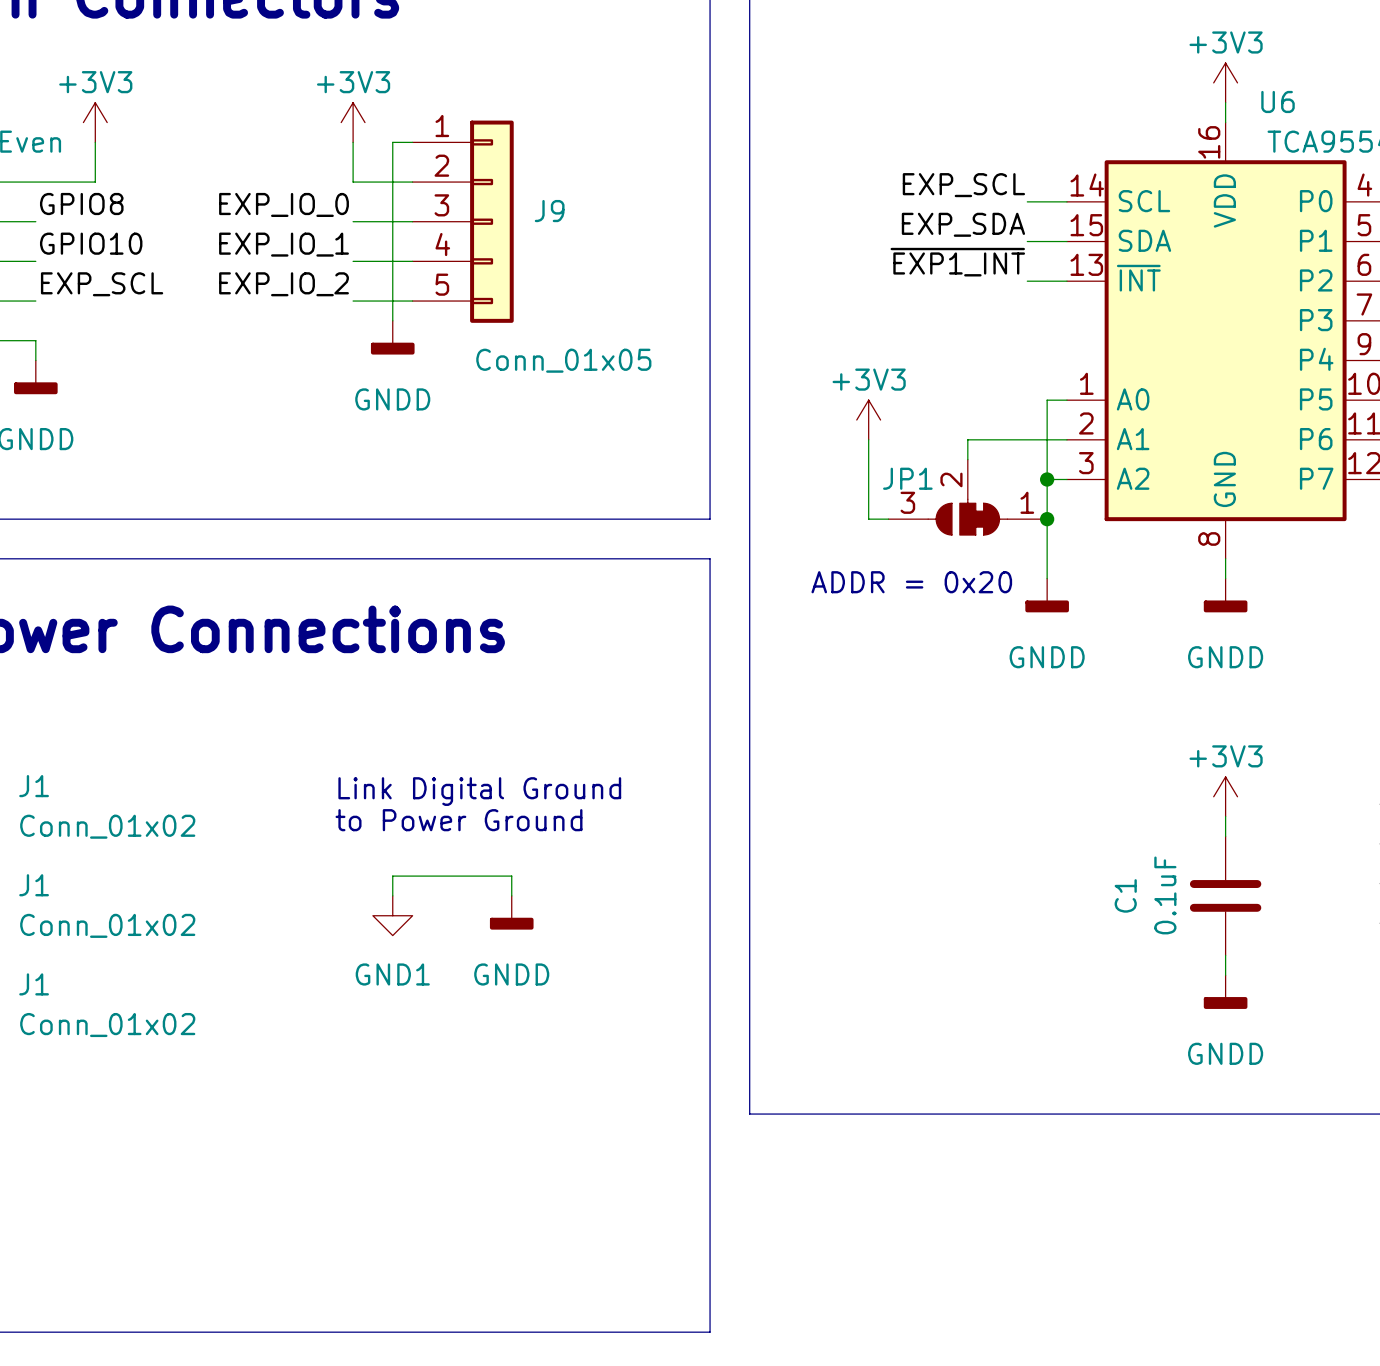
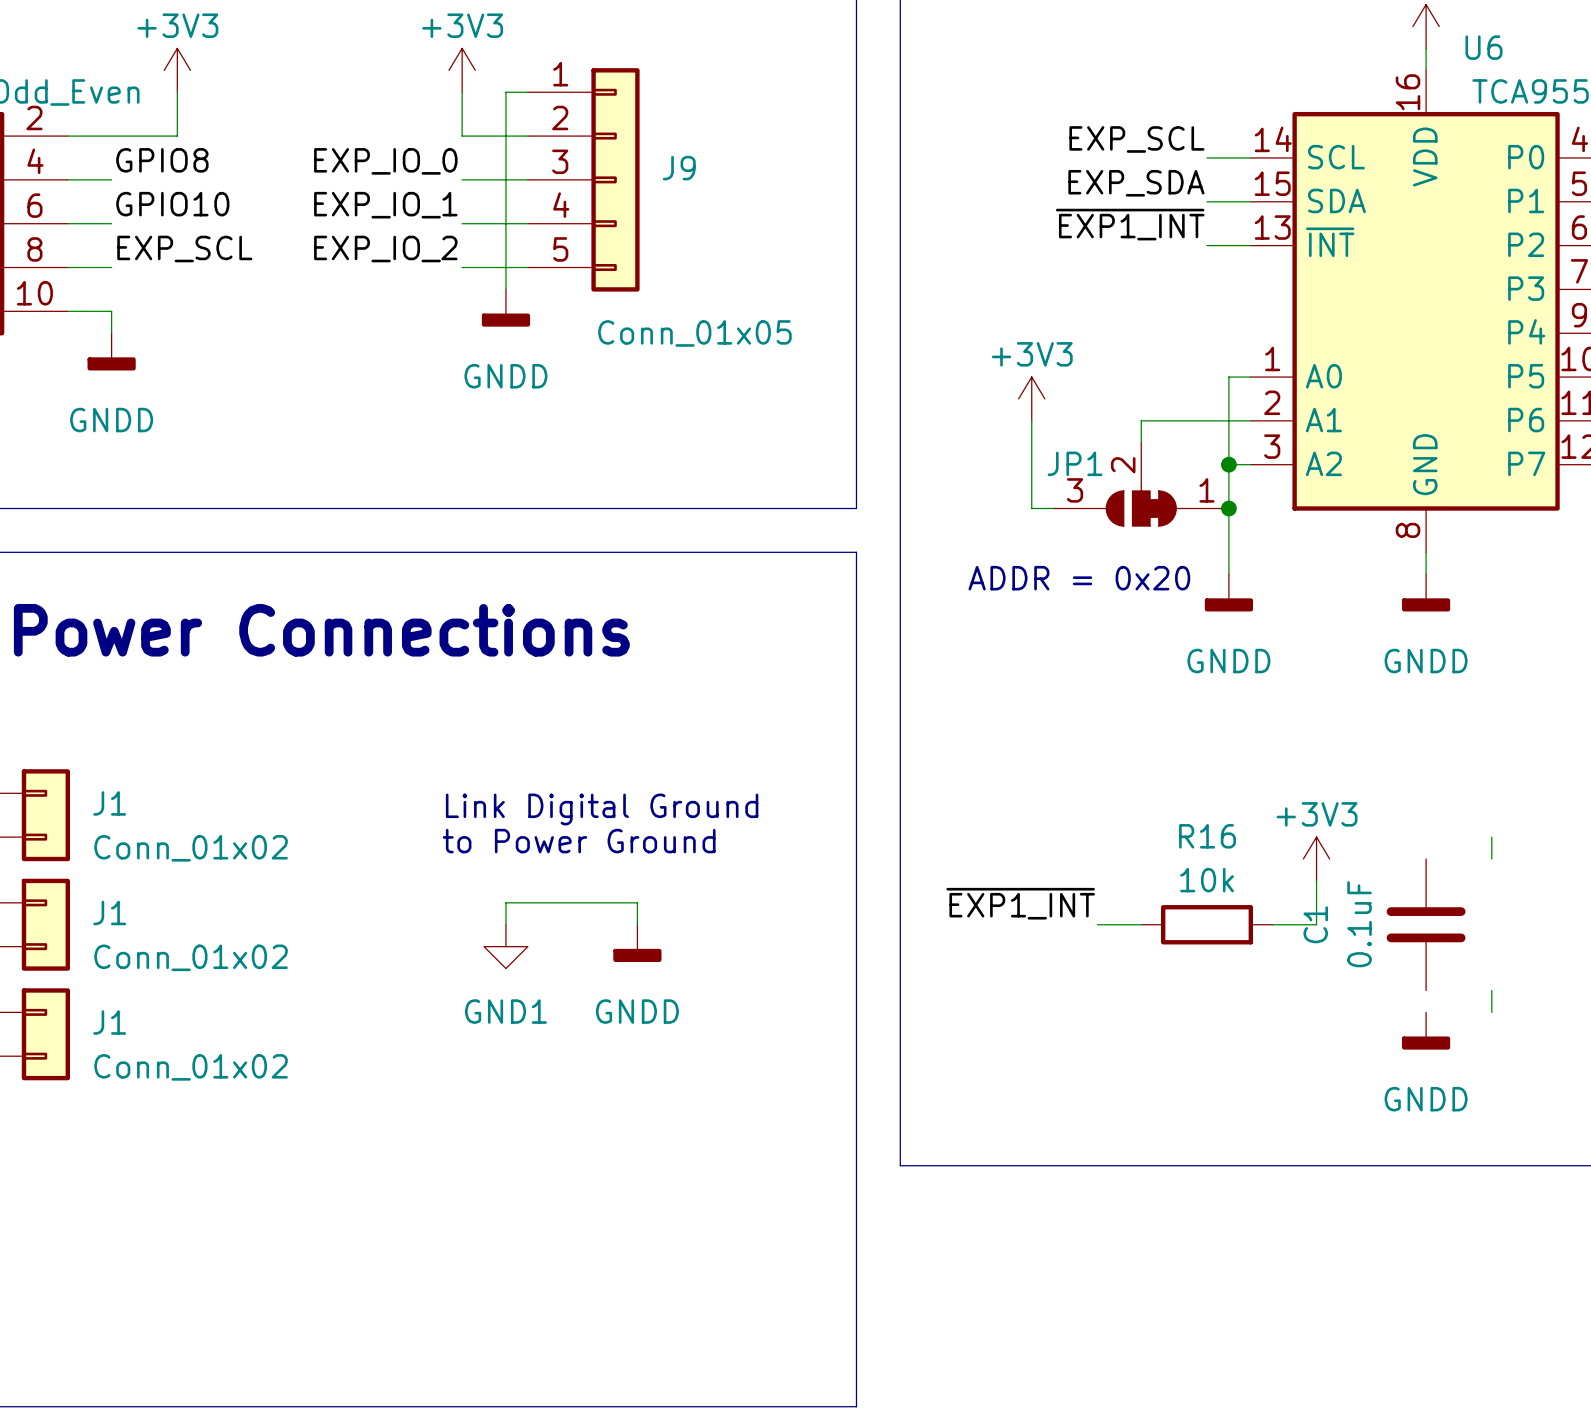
power symbol position: +3V3 (1225, 796) -> +3V3 (1316, 859)
wire: (1225, 816) (1225, 836) -> (1491, 837) (1491, 859)
wire: none -> (1316, 880) (1316, 924) (1272, 924)
label: none -> ~{EXP1_INT} (1020, 903)
wire: none -> (1097, 924) (1141, 924)
R16: none -> 10k (1207, 924)
wire: (1225, 955) (1225, 975) -> (1491, 990) (1491, 1012)

